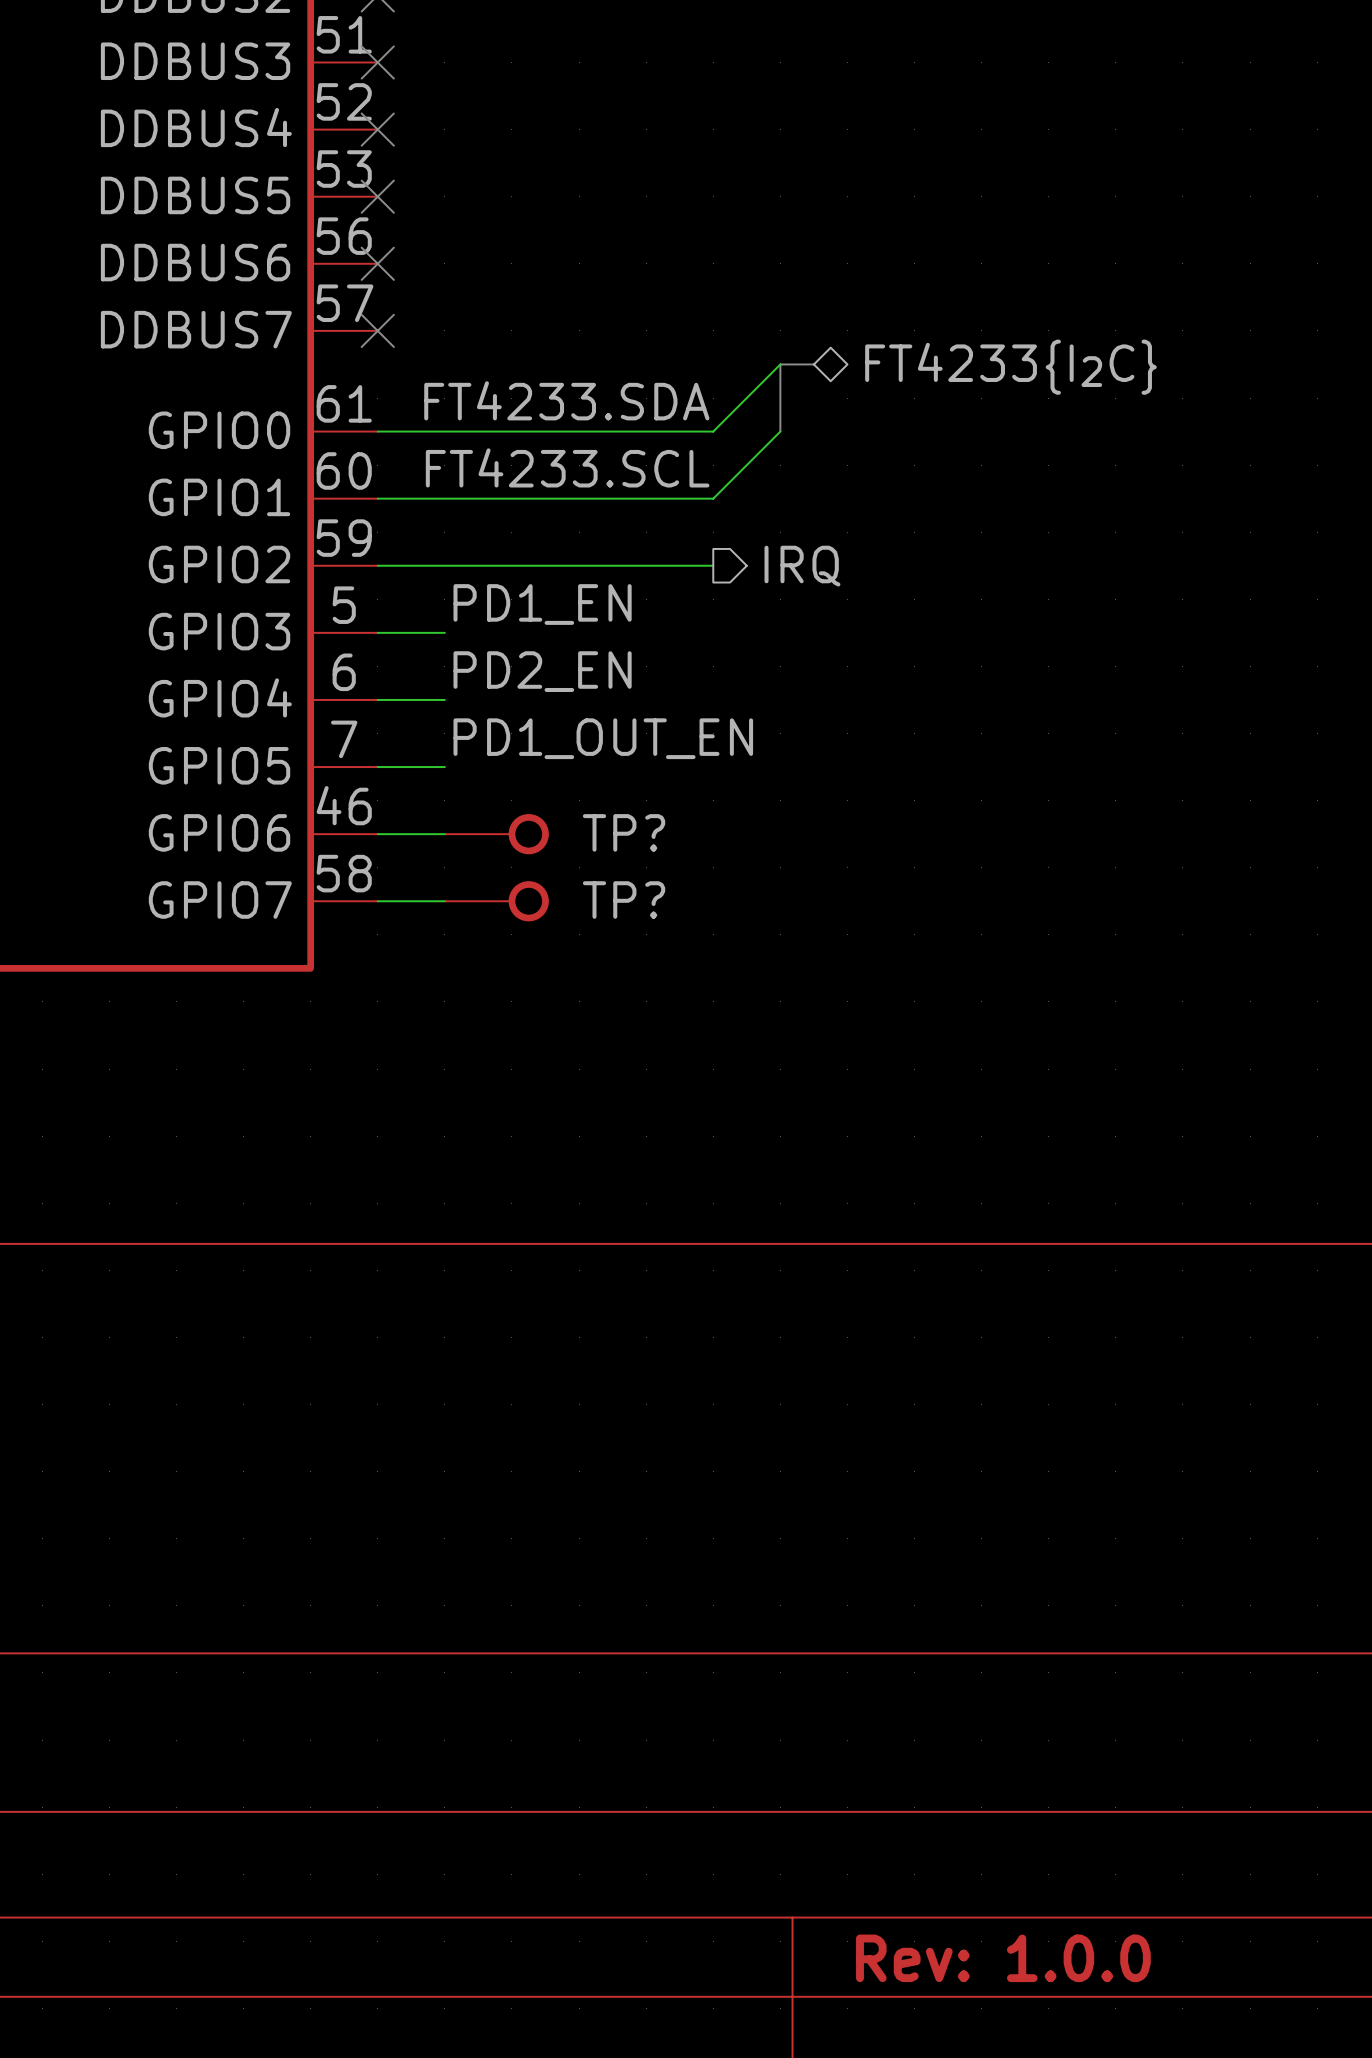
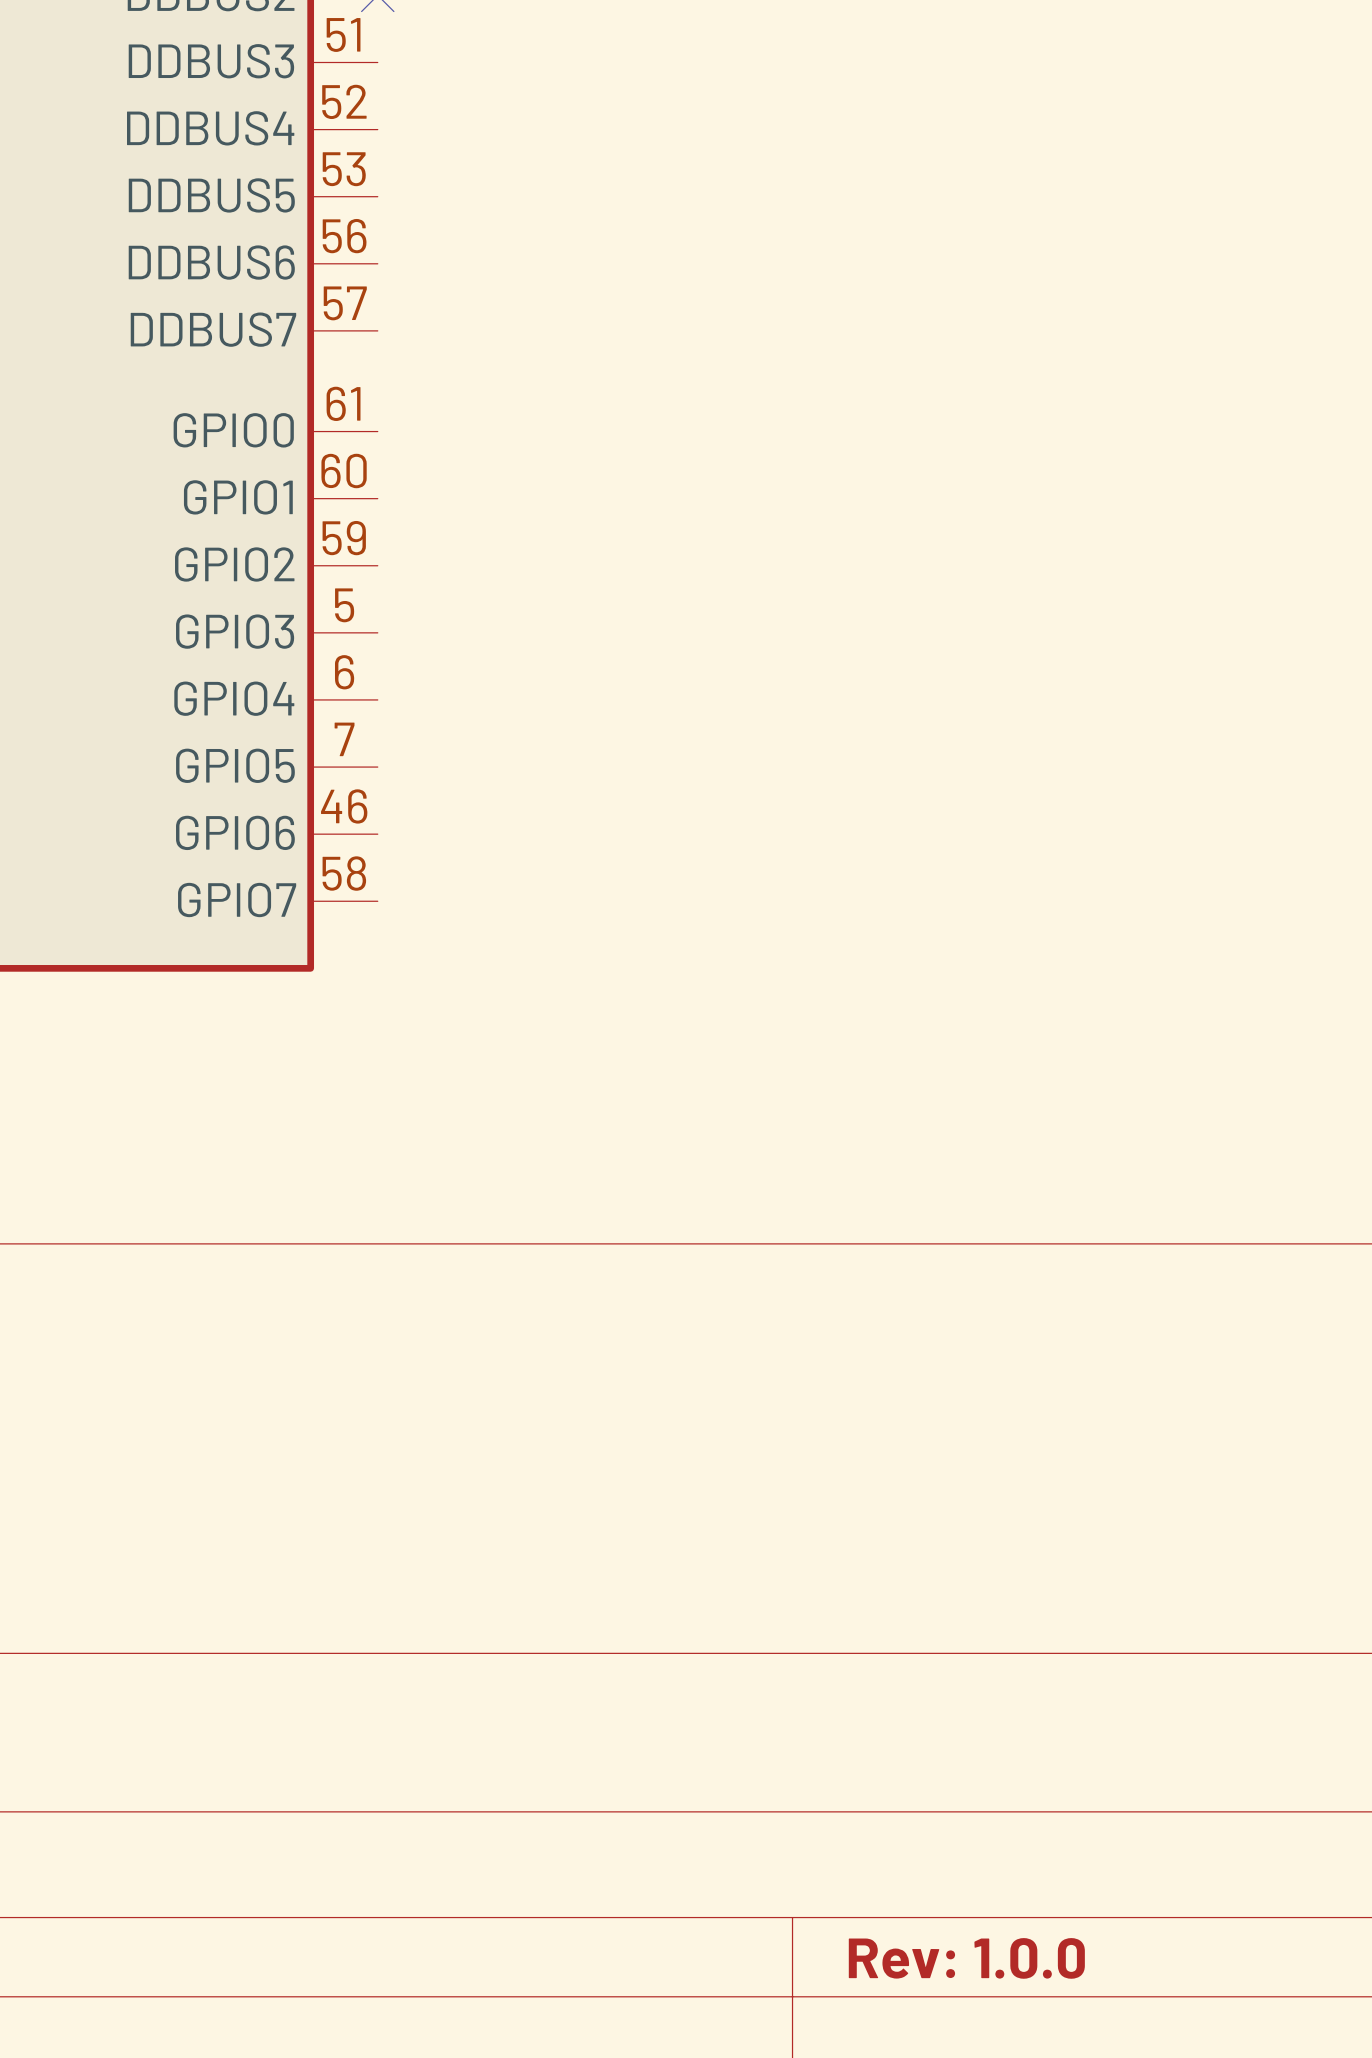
no-connect mark: (377, 62) -> none
no-connect mark: (377, 129) -> none
no-connect mark: (377, 196) -> none
no-connect mark: (377, 263) -> none
no-connect mark: (377, 330) -> none
wire: (780, 364) (713, 431) (377, 431) -> none
bus: (813, 364) (780, 364) (780, 431) -> none
hierarchical label: FT4233{I2C} (1010, 367) -> none
label: FT4233.SDA (566, 400) -> none
wire: (780, 431) (713, 498) (377, 498) -> none
label: FT4233.SCL (567, 467) -> none
wire: (377, 565) (713, 565) -> none
hierarchical label: IRQ (802, 566) -> none
label: PD1_EN (542, 604) -> none
wire: (377, 632) (444, 632) -> none
label: PD2_EN (542, 671) -> none
wire: (377, 699) (444, 699) -> none
label: PD1_OUT_EN (603, 738) -> none
wire: (377, 767) (444, 767) -> none
wire: (377, 834) (444, 834) -> none
TP?: (496, 834) -> none
wire: (377, 901) (444, 901) -> none
TP?: (496, 901) -> none

